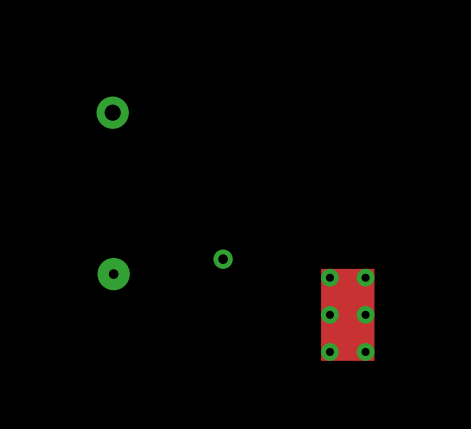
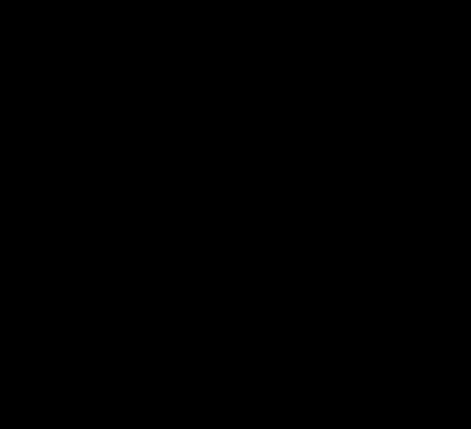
via: (112, 112) -> none
via: (223, 259) -> none
via: (113, 274) -> none
part: (347, 314) -> none

